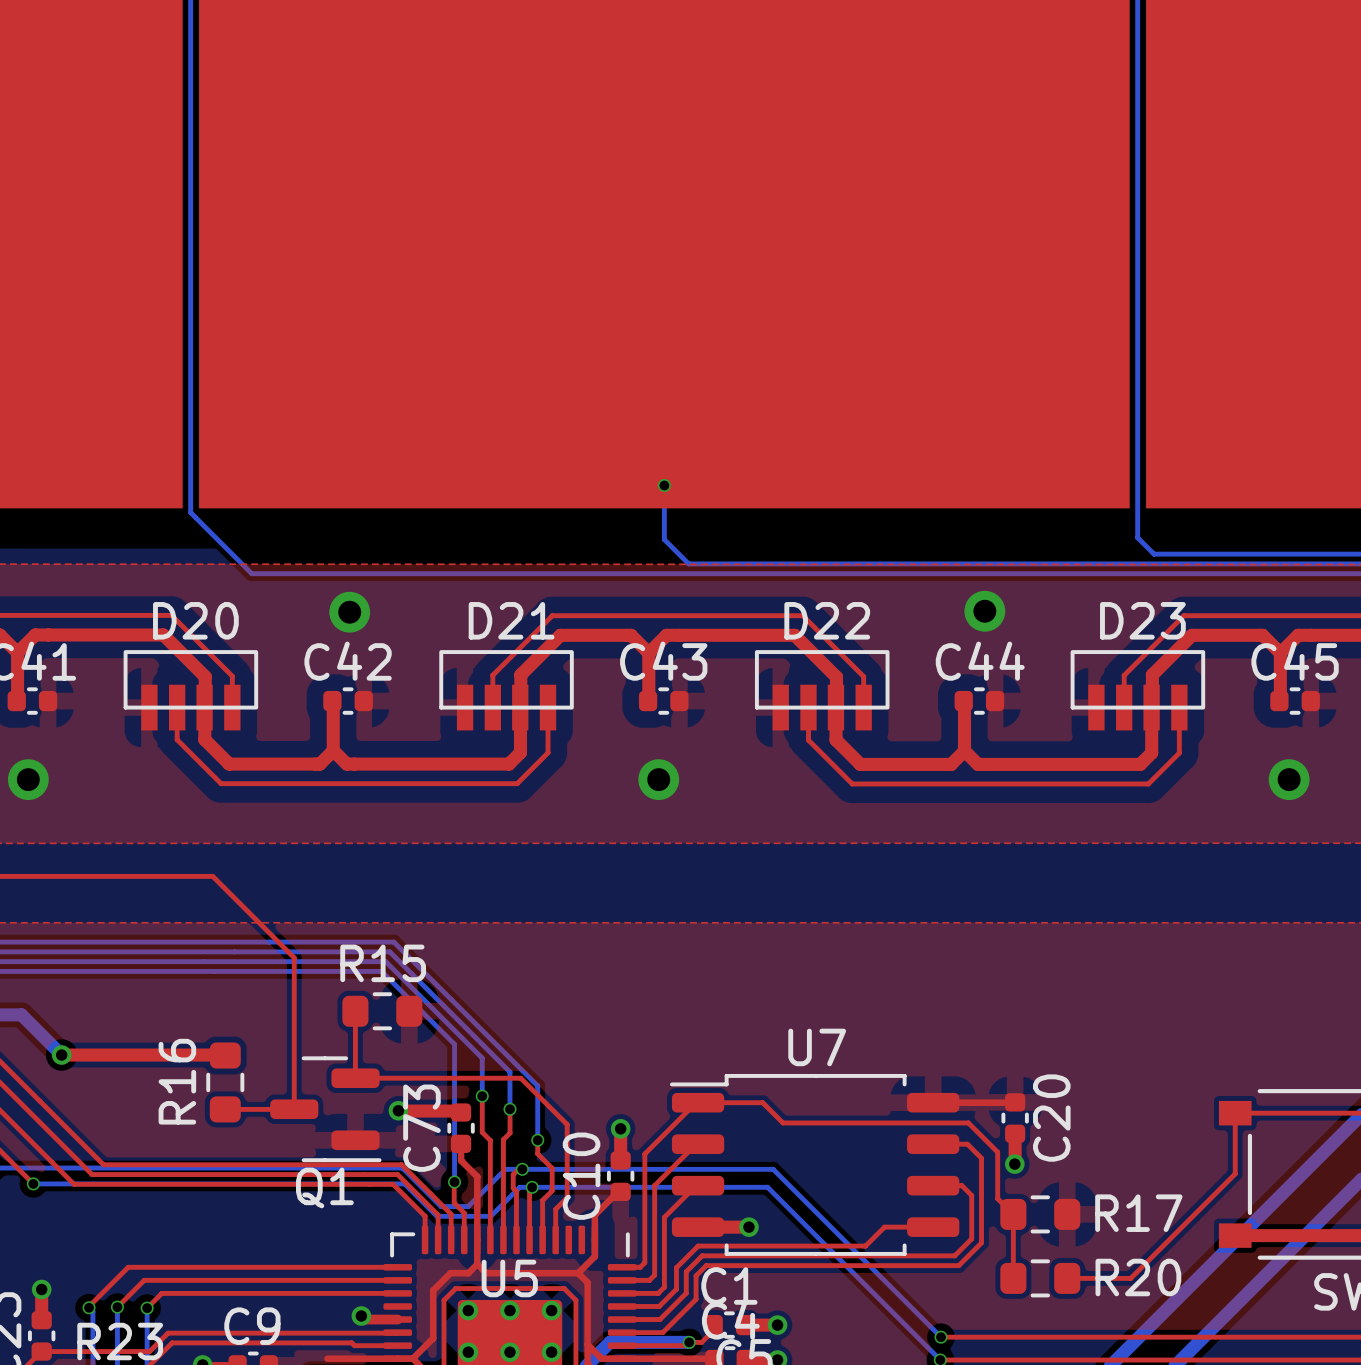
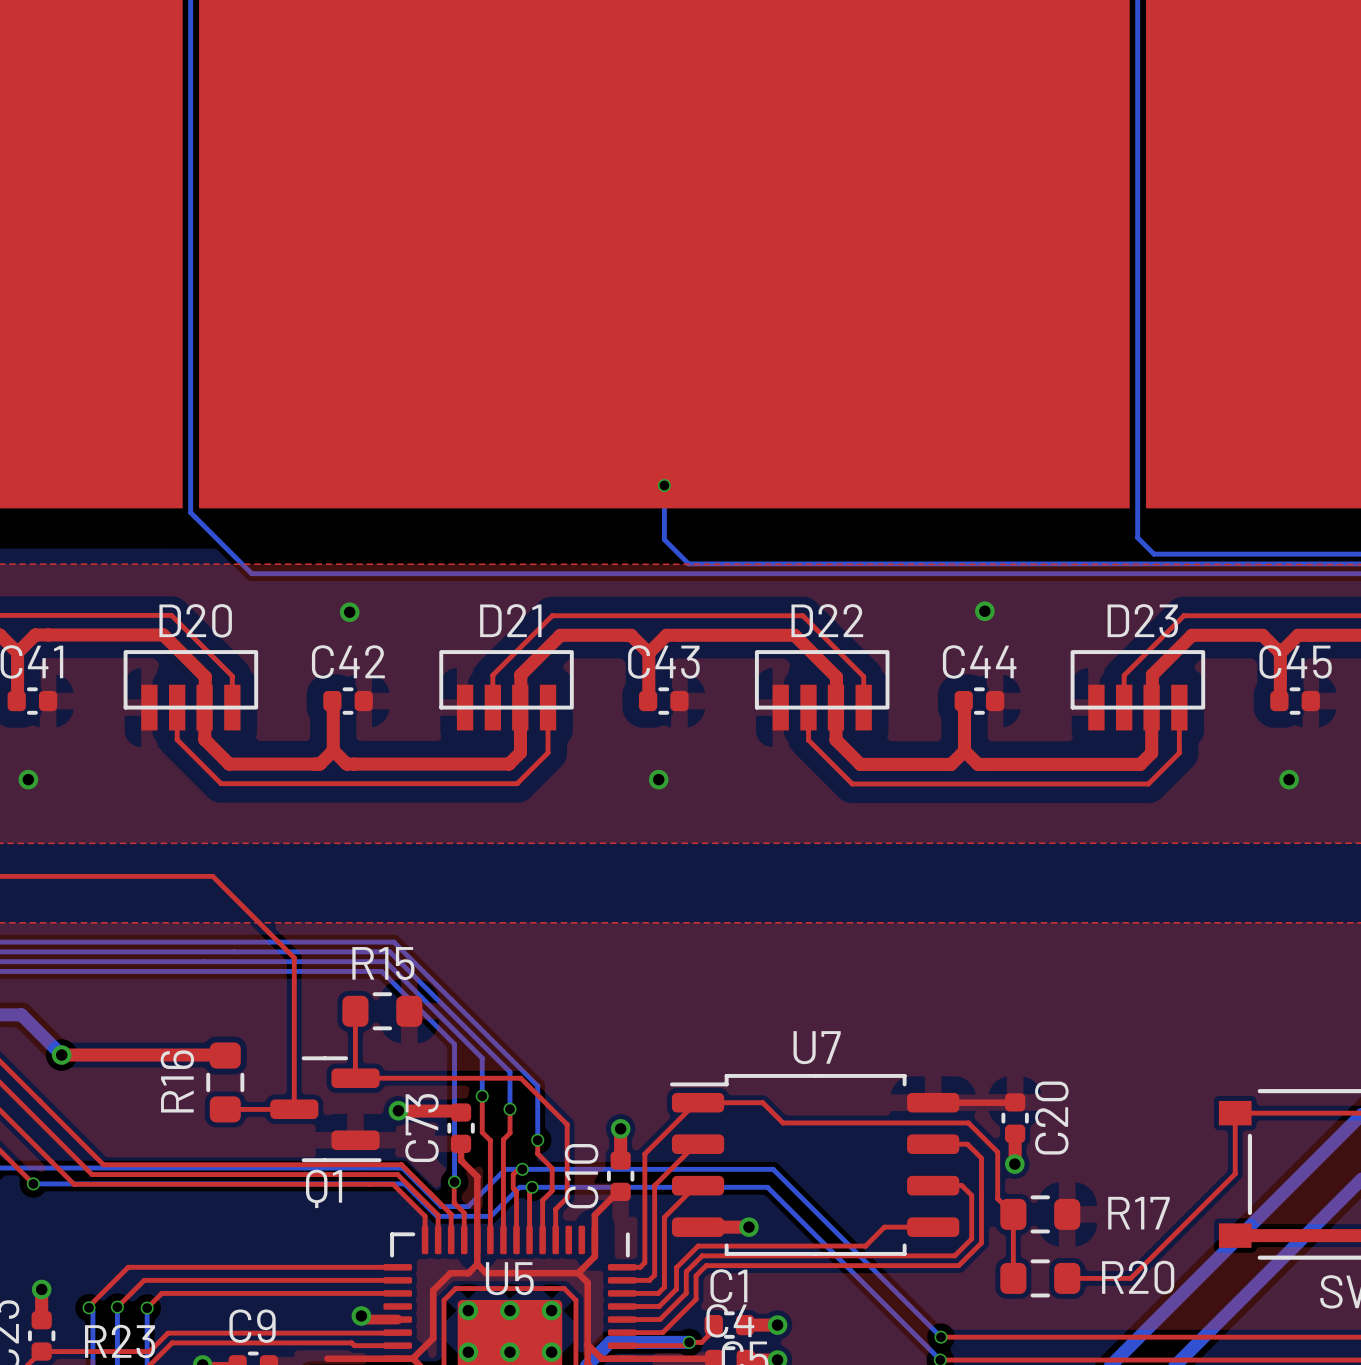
via size: [964, 590, 1006, 632] -> [975, 601, 995, 622]
via size: [329, 591, 371, 633] -> [339, 602, 360, 623]
via size: [7, 759, 49, 801] -> [18, 769, 39, 790]
via size: [638, 759, 680, 801] -> [648, 769, 669, 790]
via size: [1268, 759, 1310, 801] -> [1279, 769, 1299, 790]

